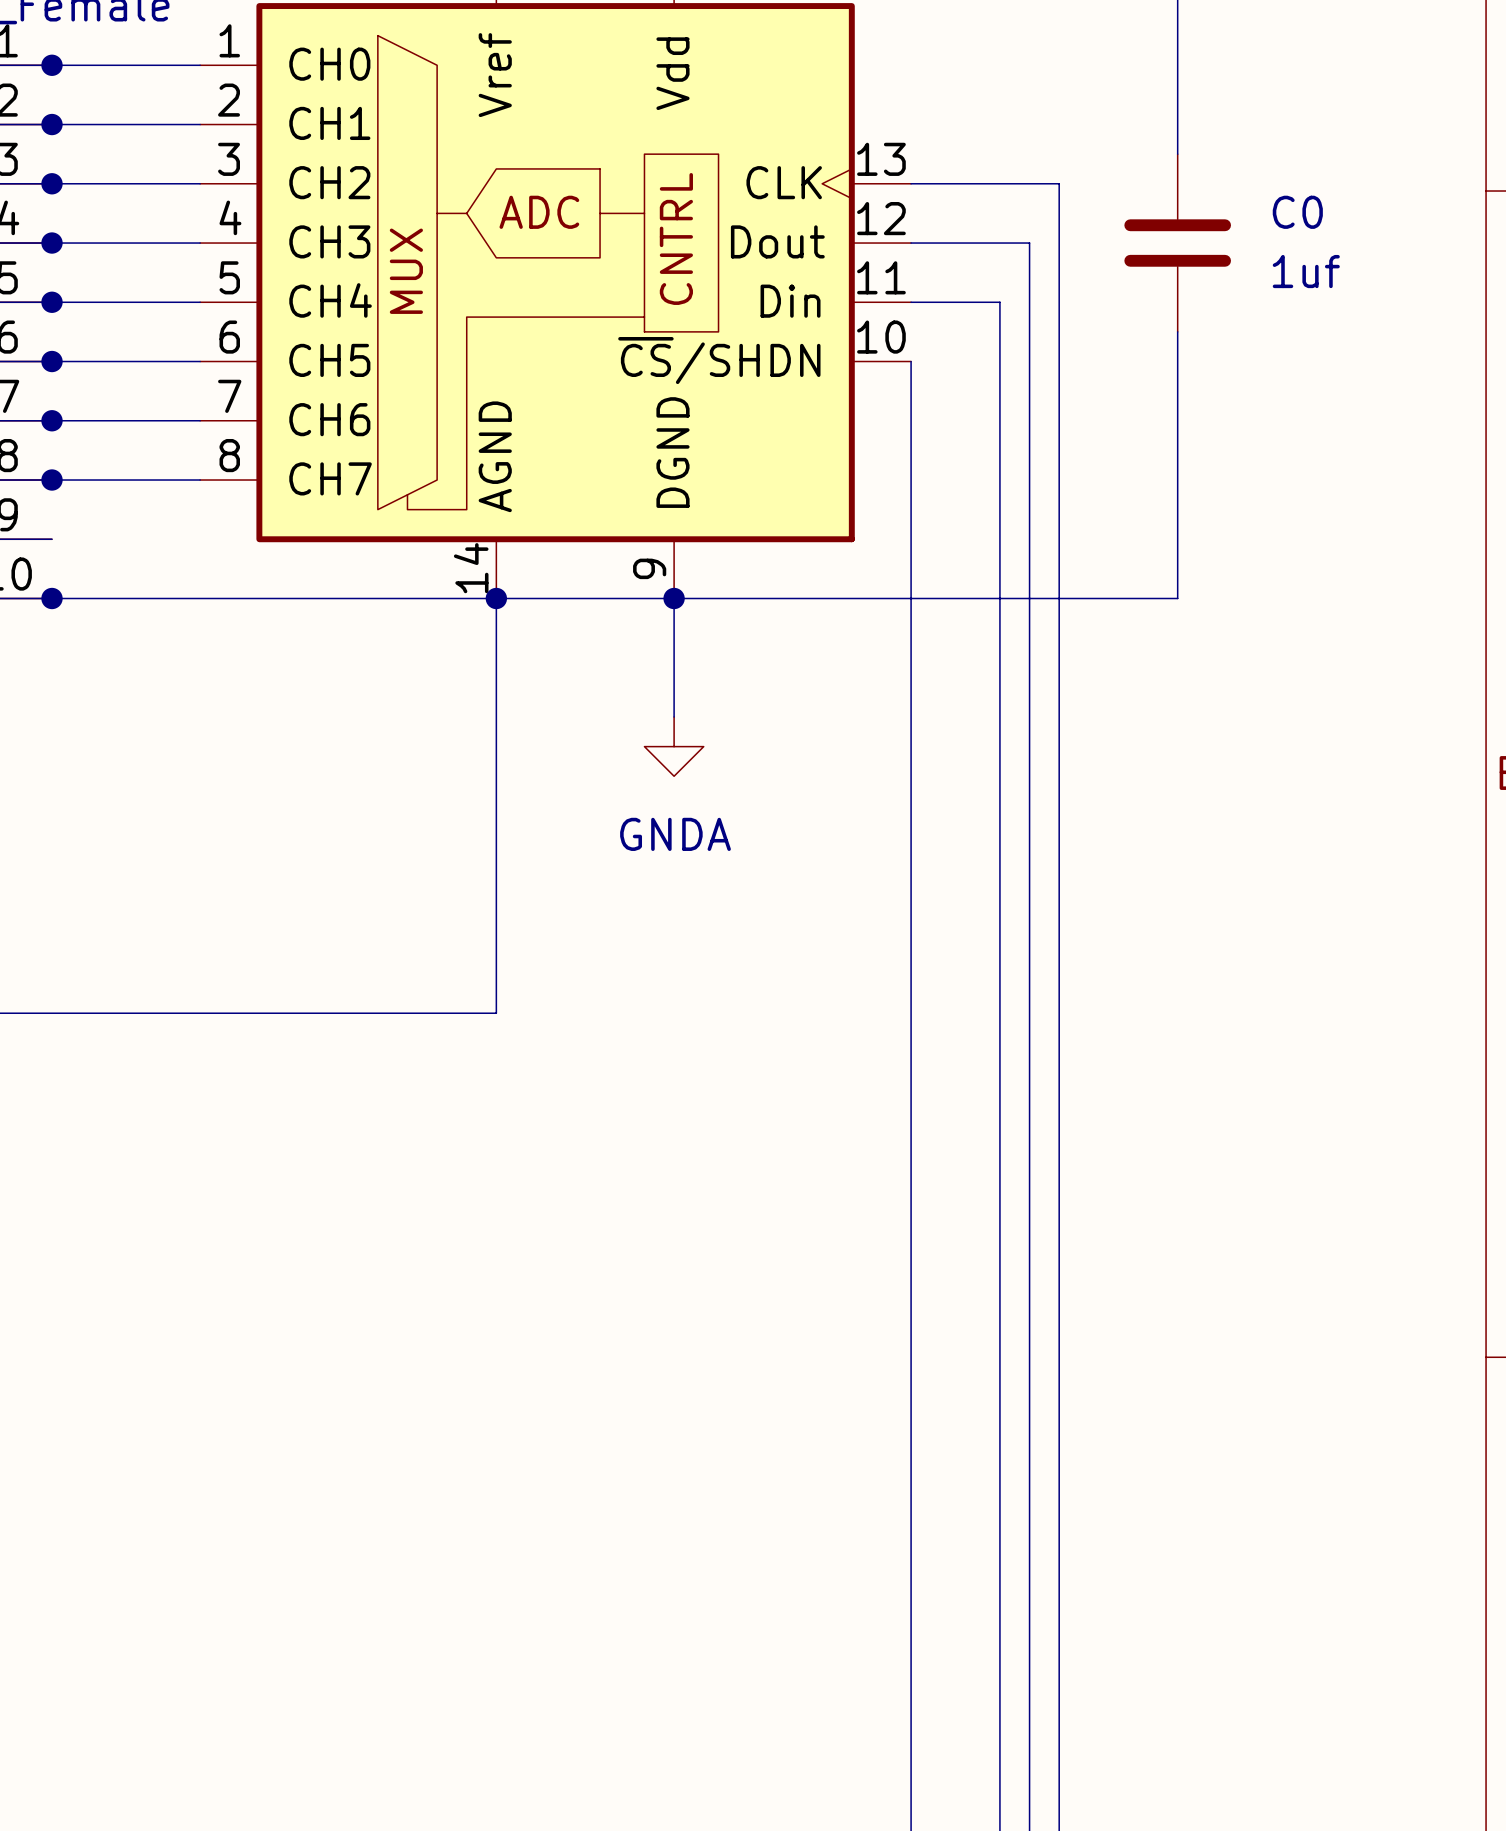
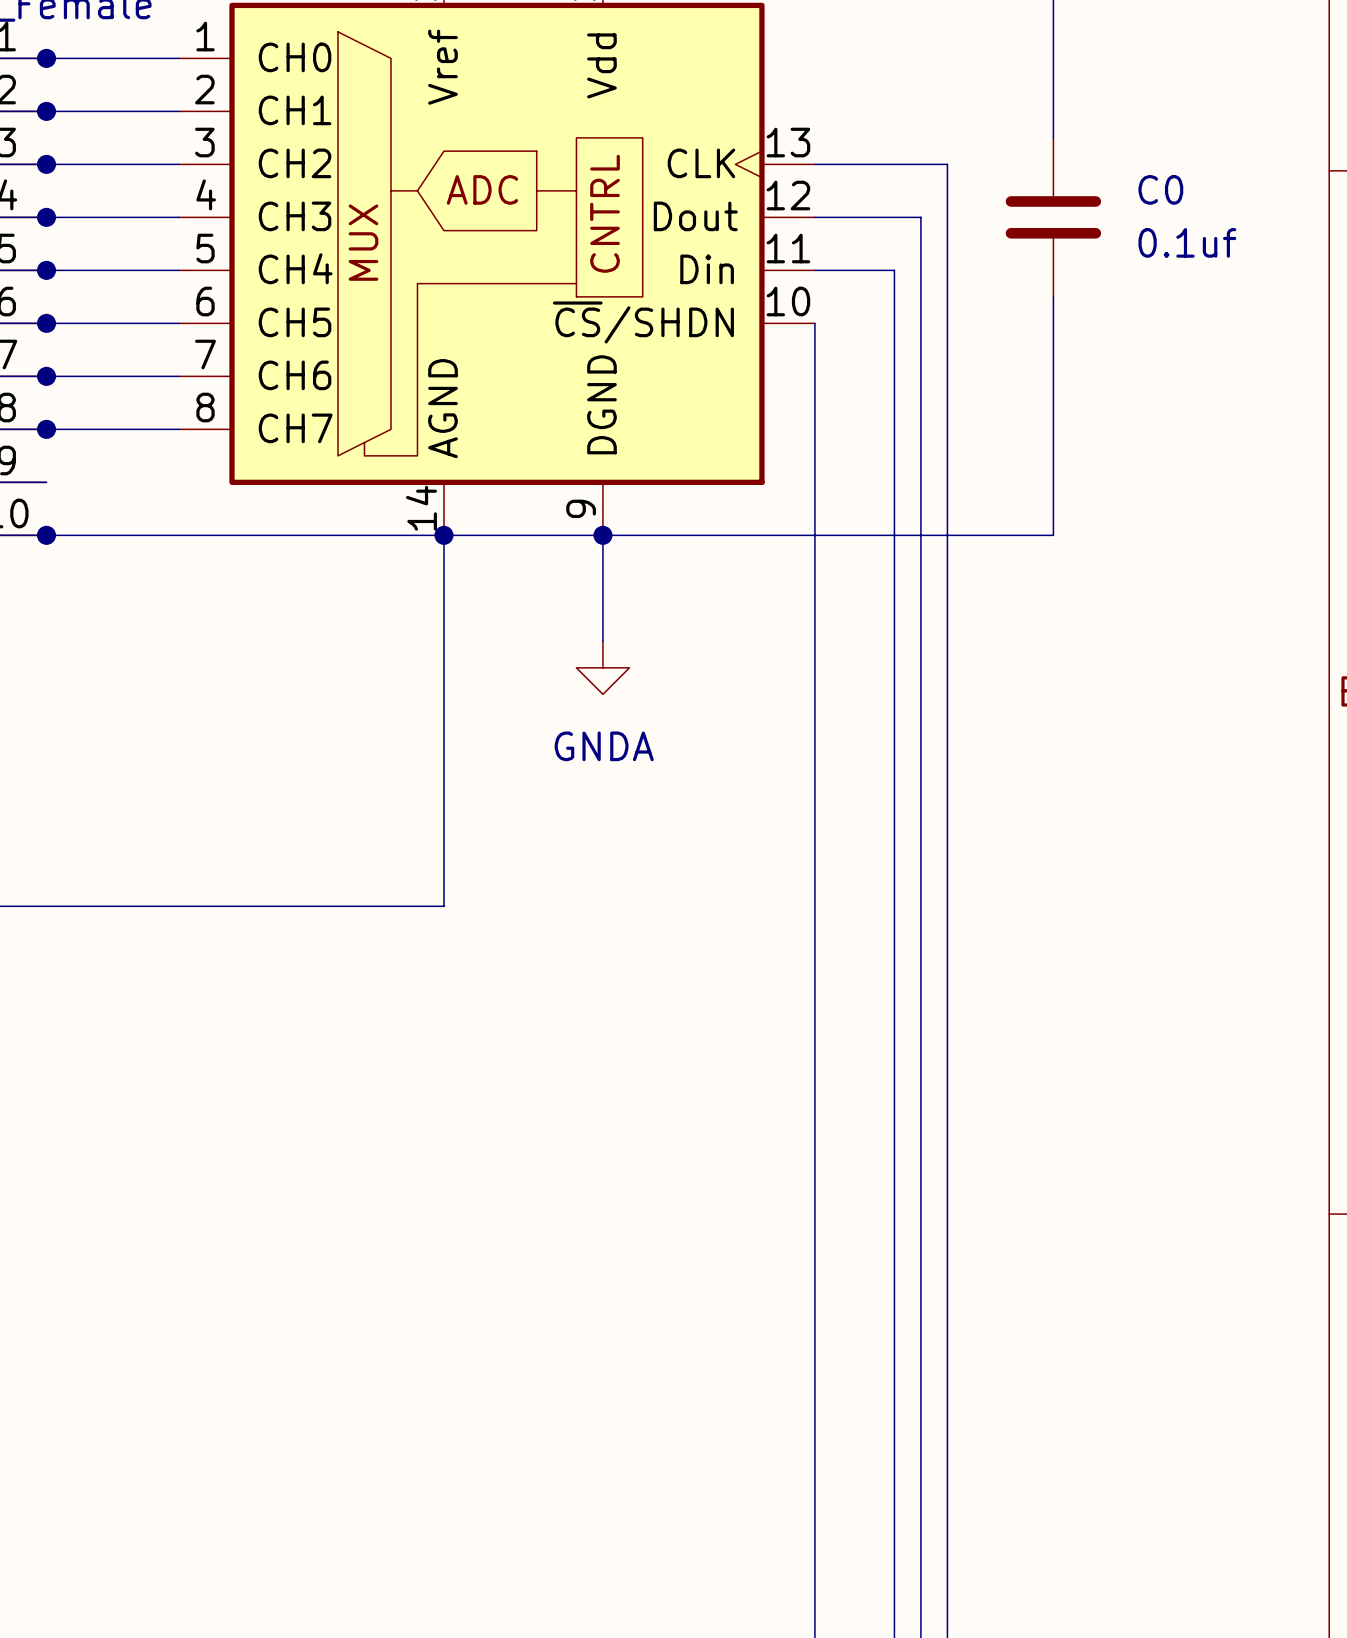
C0 value: 1uf (1306, 271) -> 0.1uf (1187, 242)

